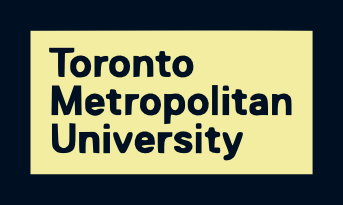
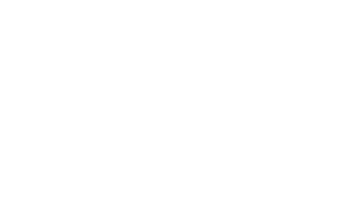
drawing: [30, 30, 313, 175] -> none

